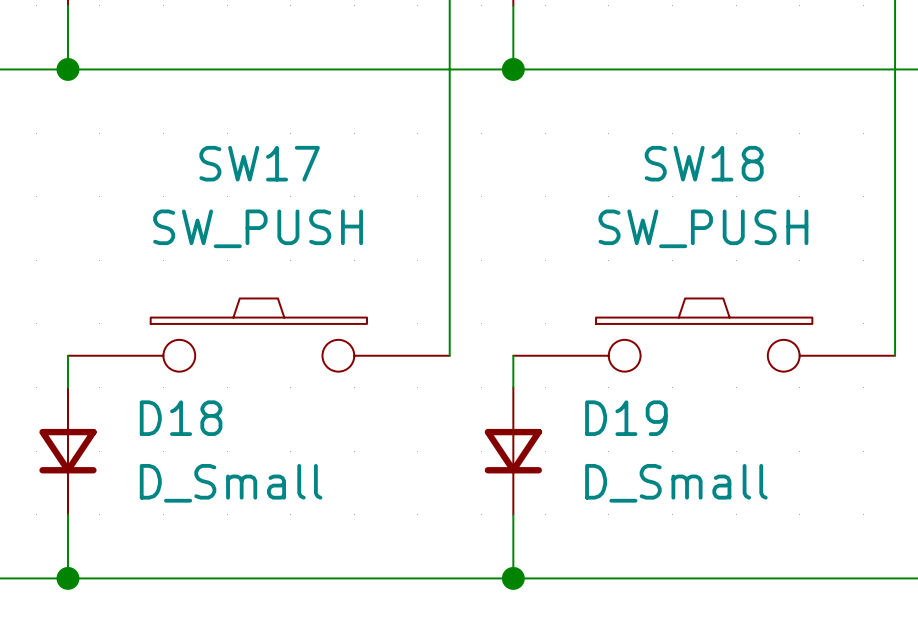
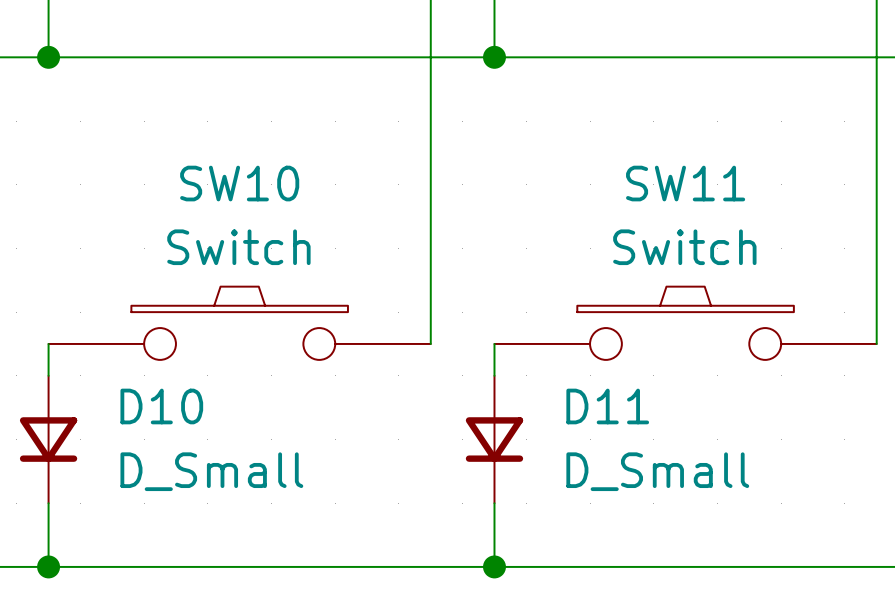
SW17 name: SW17 (259, 163) -> SW10 (239, 183)
SW18 name: SW18 (704, 163) -> SW11 (685, 183)
SW17 value: SW_PUSH (258, 228) -> Switch (238, 247)
SW18 value: SW_PUSH (703, 228) -> Switch (684, 247)
D18 name: D18 (181, 418) -> D10 (161, 406)
D19 name: D19 (626, 418) -> D11 (607, 406)

